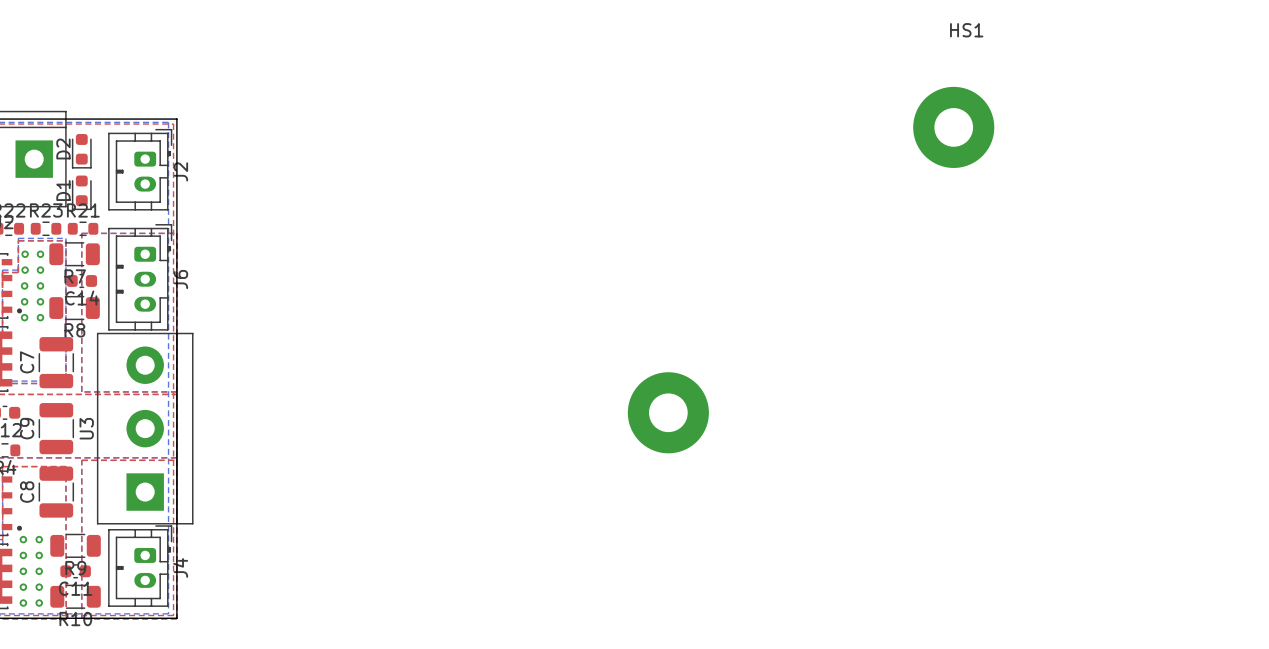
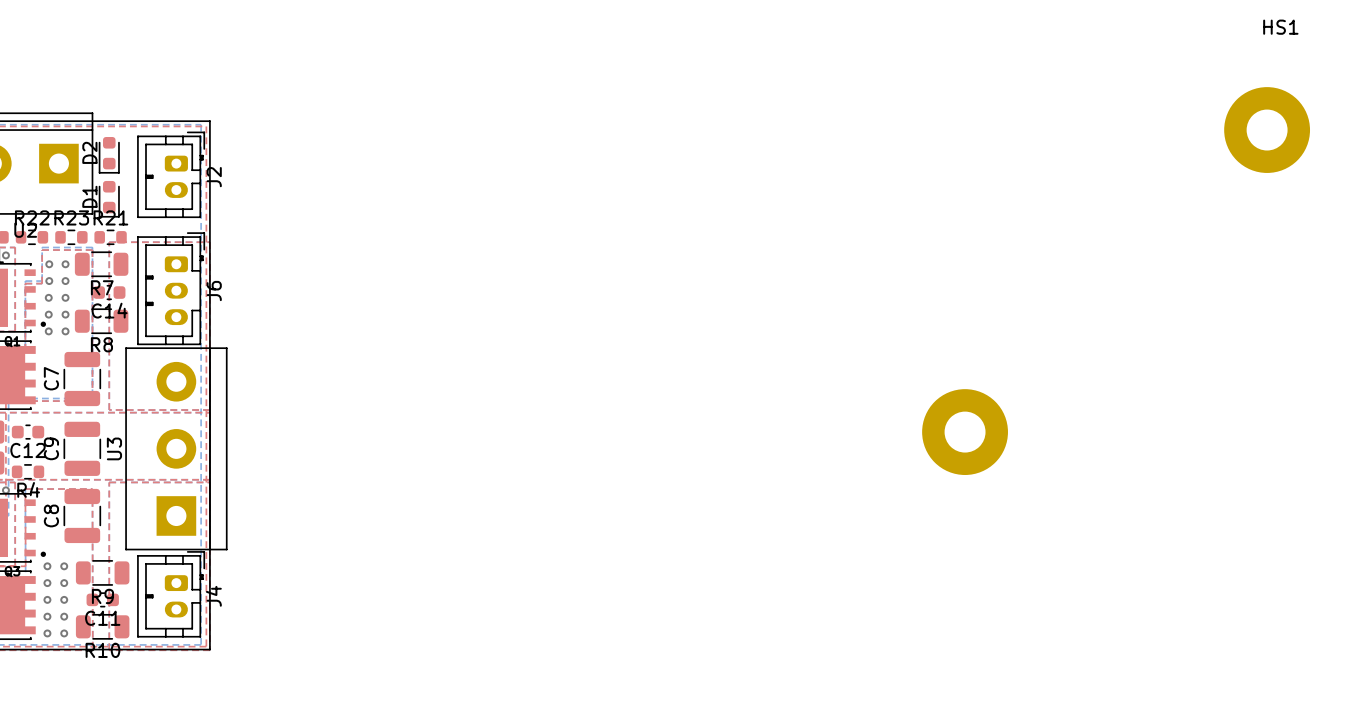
HS1 position: (811, 270) -> (1116, 281)

